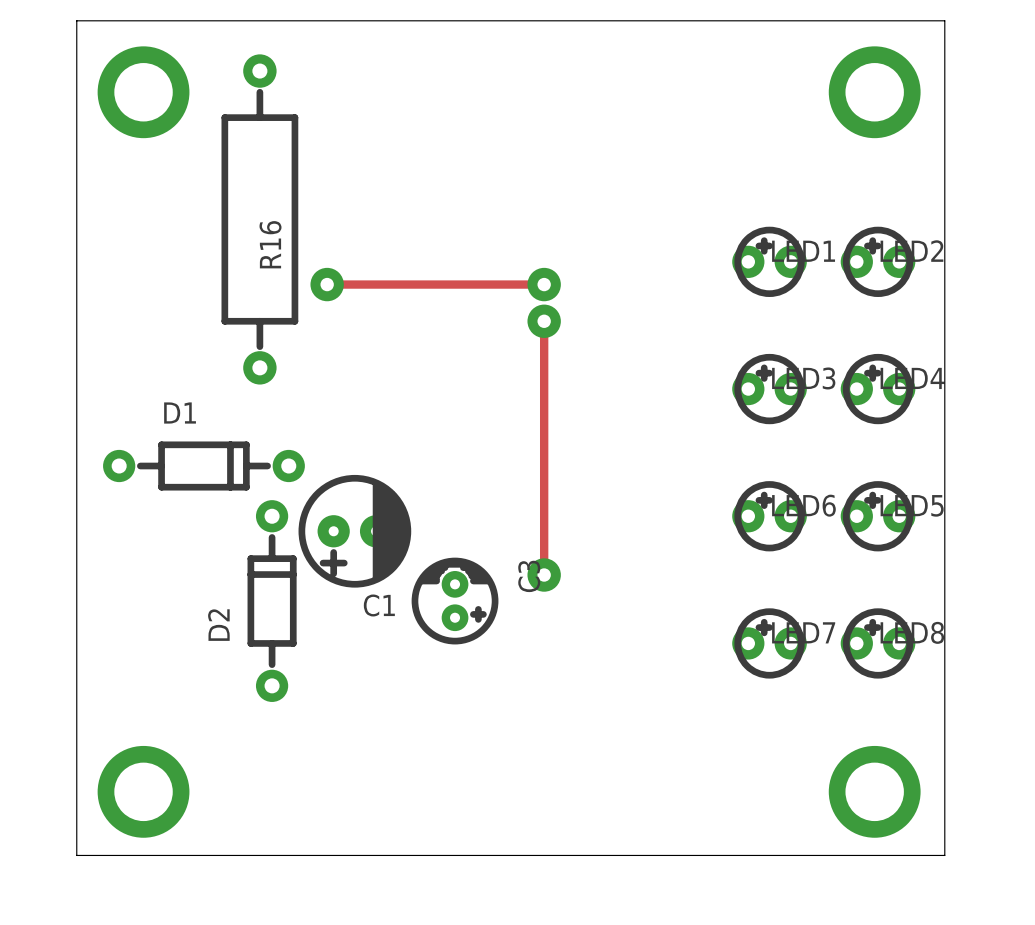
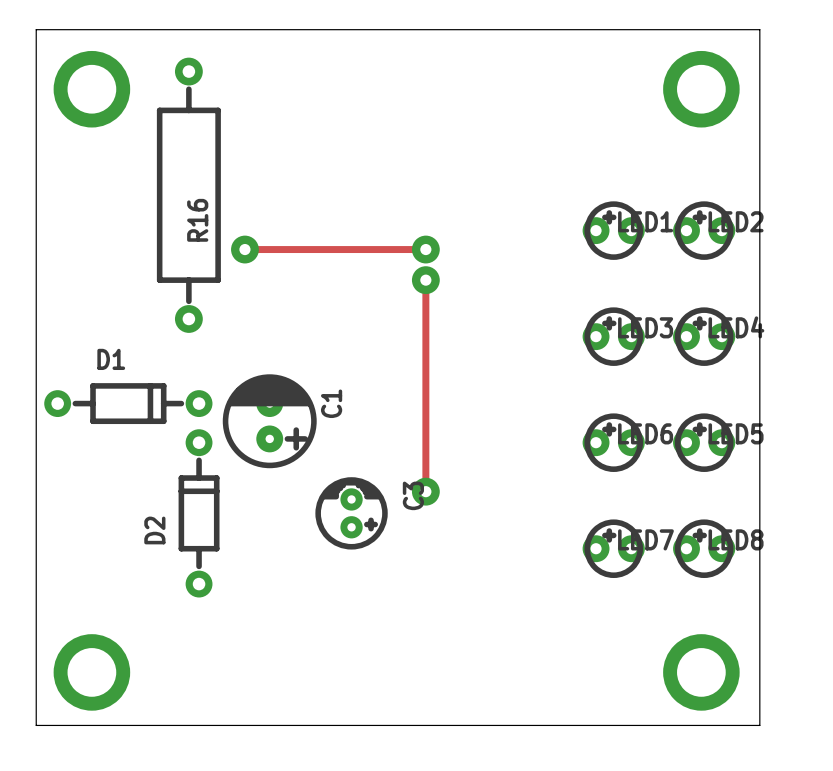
D1 position: (203, 466) -> (128, 403)
C1 rotation: 0° (354, 531) -> 90° counterclockwise (269, 421)

